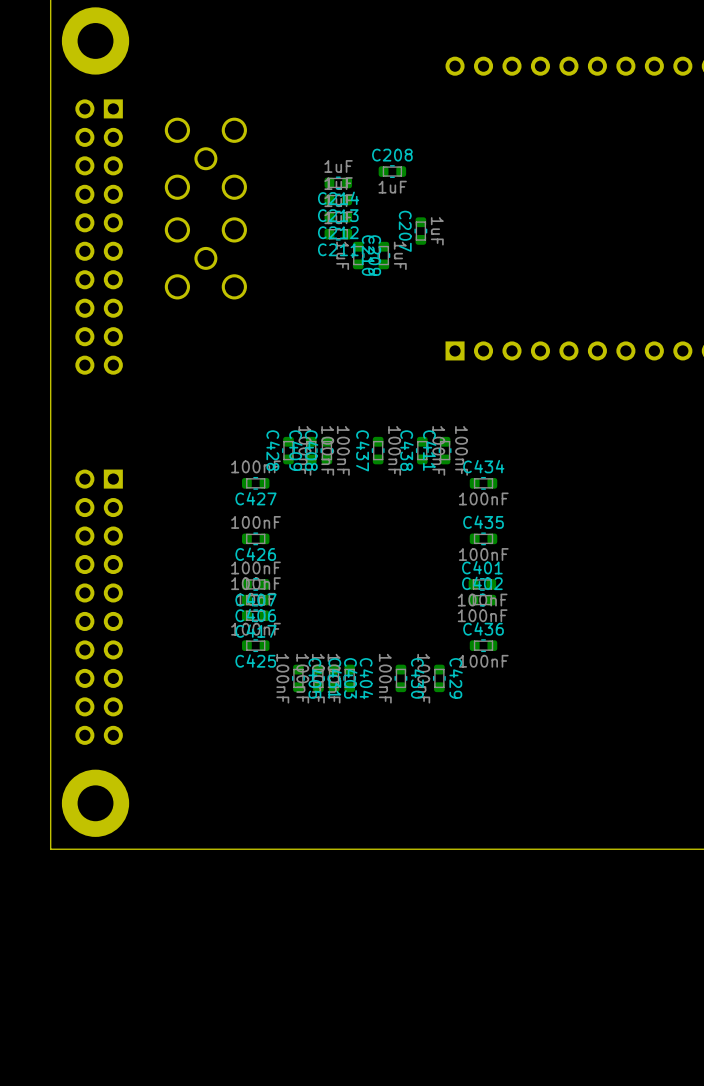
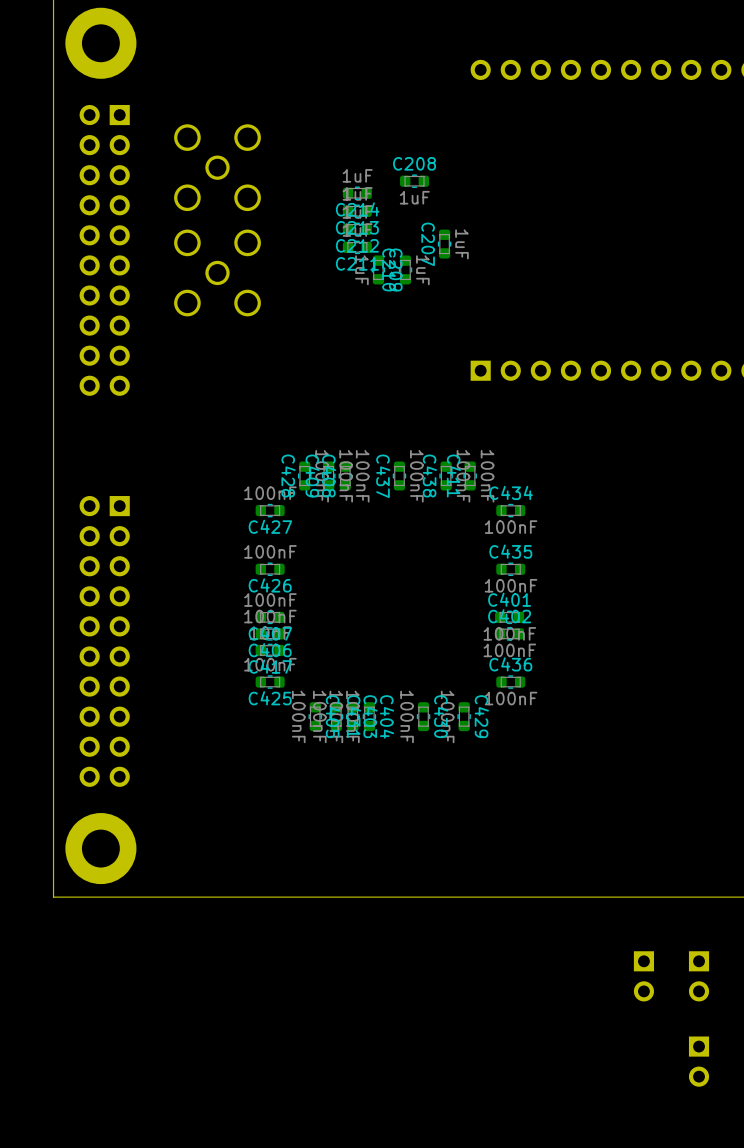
part: none -> (643, 976)
part: none -> (699, 976)
part: none -> (699, 1061)

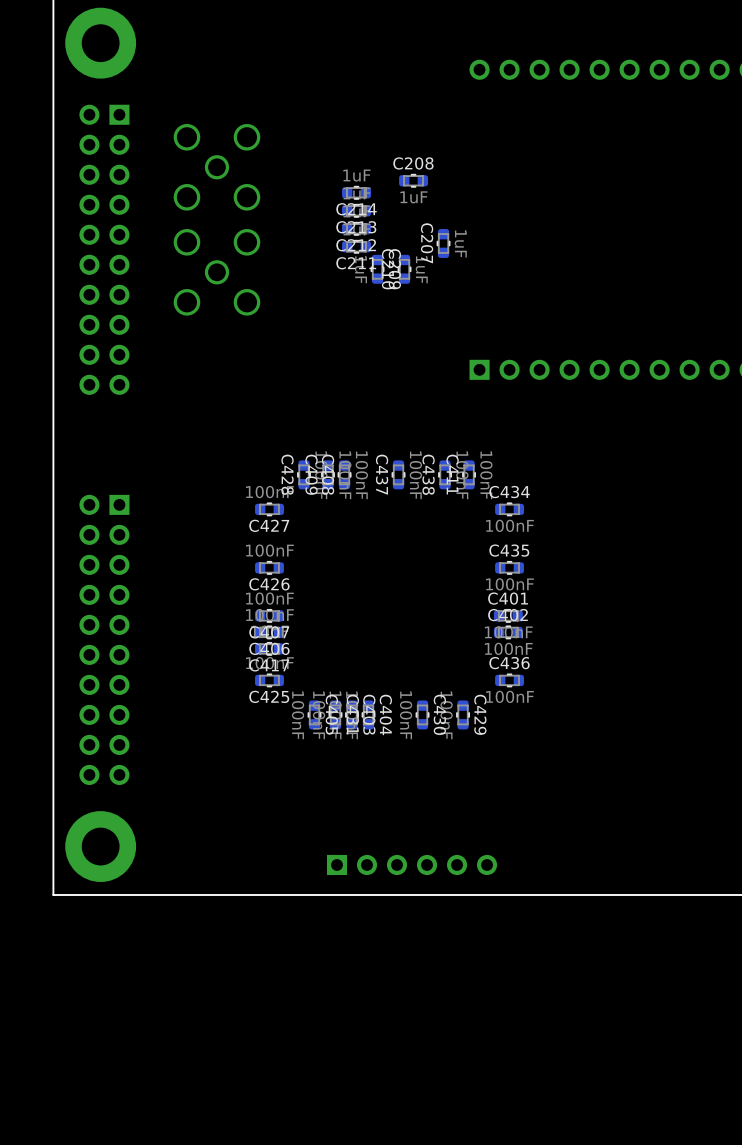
part: none -> (412, 864)
part: (643, 976) -> none
part: (699, 976) -> none
part: (699, 1061) -> none

